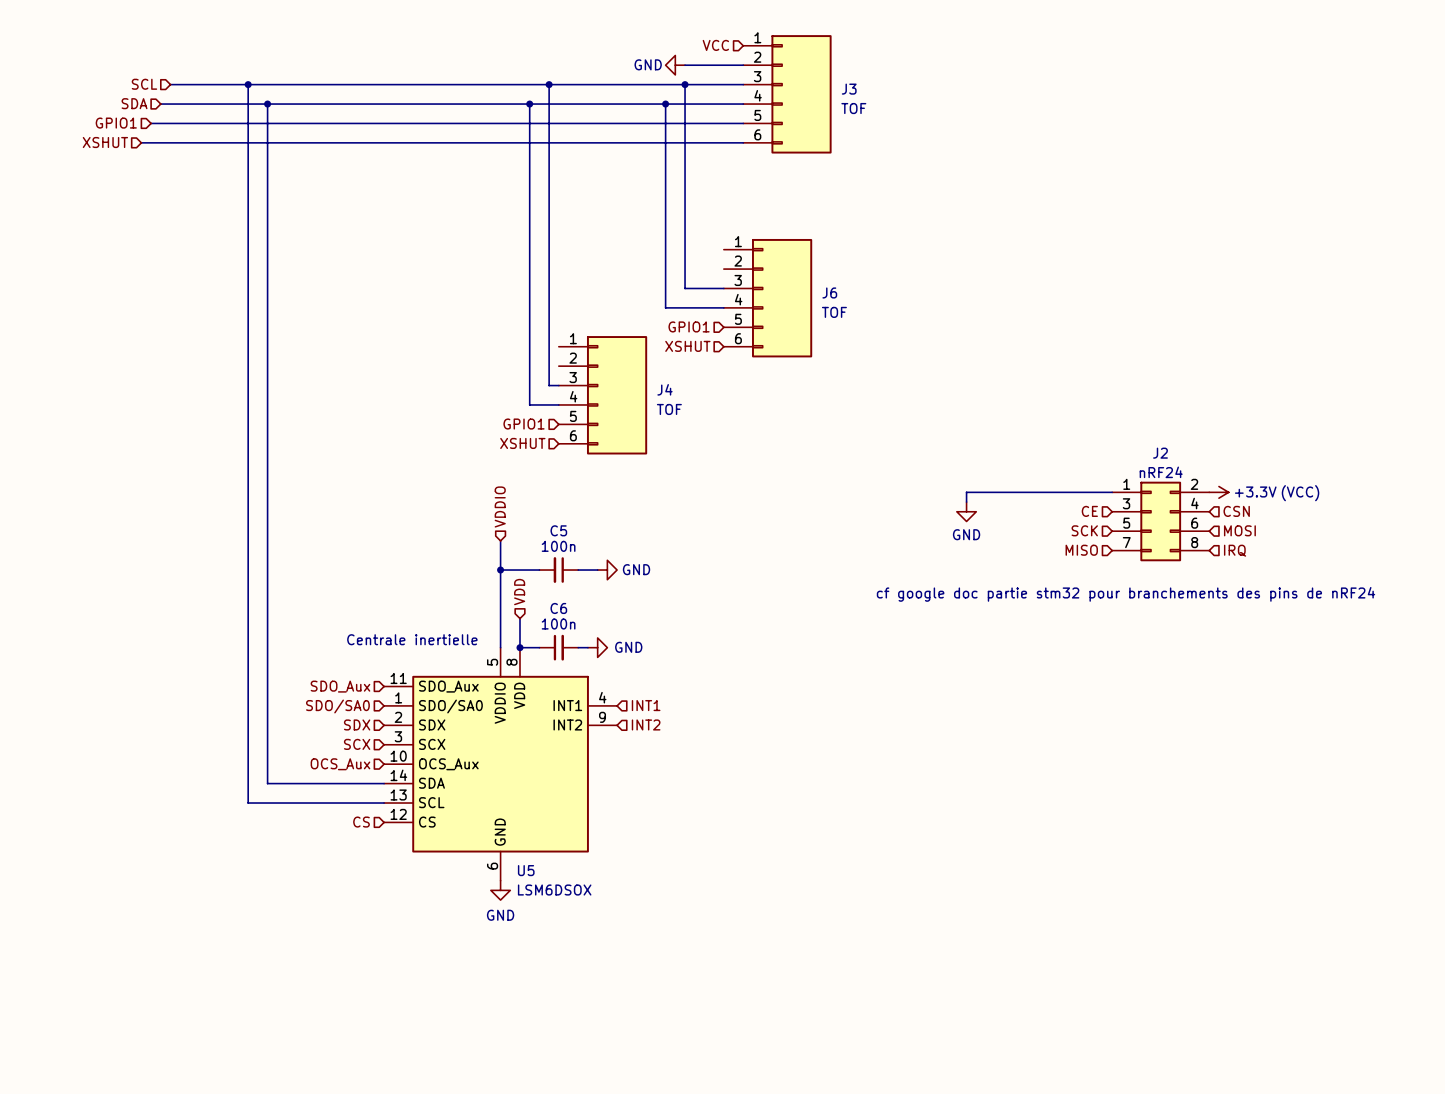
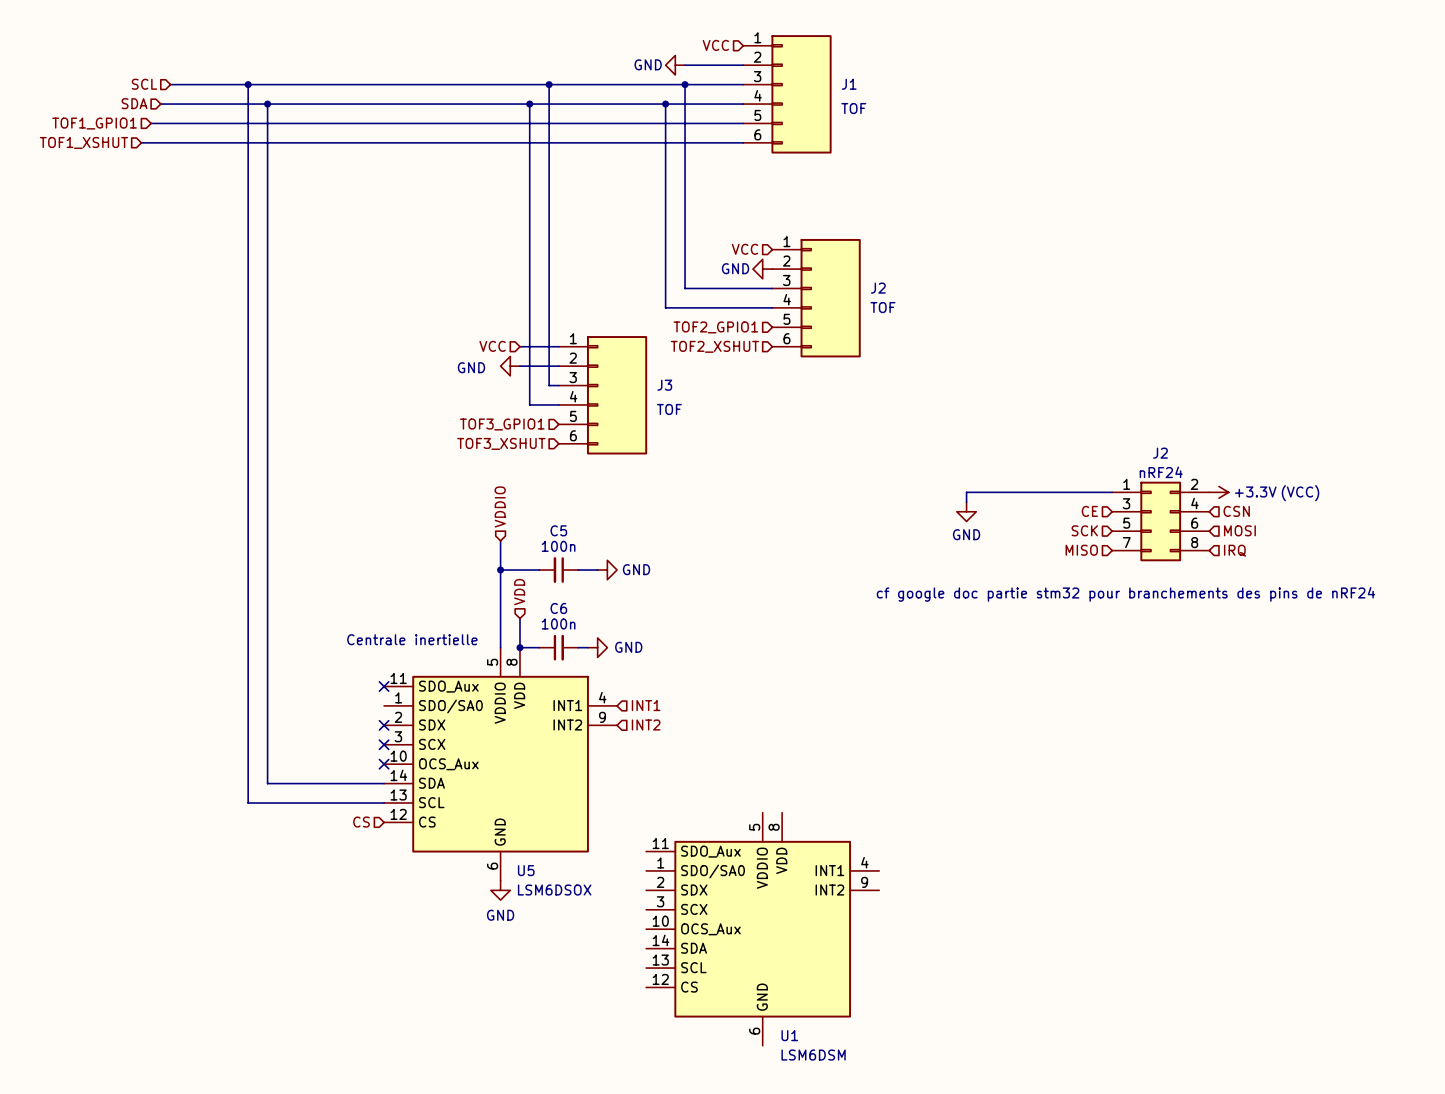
J3 name: J3 (849, 89) -> J1 (849, 84)
hierarchical label: GPIO1 (116, 123) -> TOF1_GPIO1 (94, 123)
hierarchical label: XSHUT (105, 142) -> TOF1_XSHUT (83, 142)
hierarchical label: none -> VCC (744, 249)
power symbol: none -> GND (762, 269)
J6: TOF (768, 298) -> none
J2: none -> TOF (816, 298)
hierarchical label: GPIO1 (689, 326) -> TOF2_GPIO1 (715, 327)
hierarchical label: none -> VCC (492, 346)
wire: none -> (519, 346) (558, 346)
hierarchical label: XSHUT (687, 346) -> TOF2_XSHUT (714, 346)
power symbol: none -> GND (510, 366)
wire: none -> (519, 366) (558, 366)
J4 name: J4 (664, 389) -> J3 (664, 385)
hierarchical label: GPIO1 (524, 424) -> TOF3_GPIO1 (502, 424)
hierarchical label: XSHUT (522, 443) -> TOF3_XSHUT (501, 443)
hierarchical label: SDO_Aux (340, 686) -> none
no-connect mark: none -> (384, 686)
hierarchical label: SDO/SA0 (337, 706) -> none
hierarchical label: SDX (357, 724) -> none
no-connect mark: none -> (384, 725)
hierarchical label: SCX (357, 744) -> none
no-connect mark: none -> (384, 744)
hierarchical label: OCS_Aux (340, 764) -> none
no-connect mark: none -> (384, 764)
U1: none -> LSM6DSM (762, 929)

